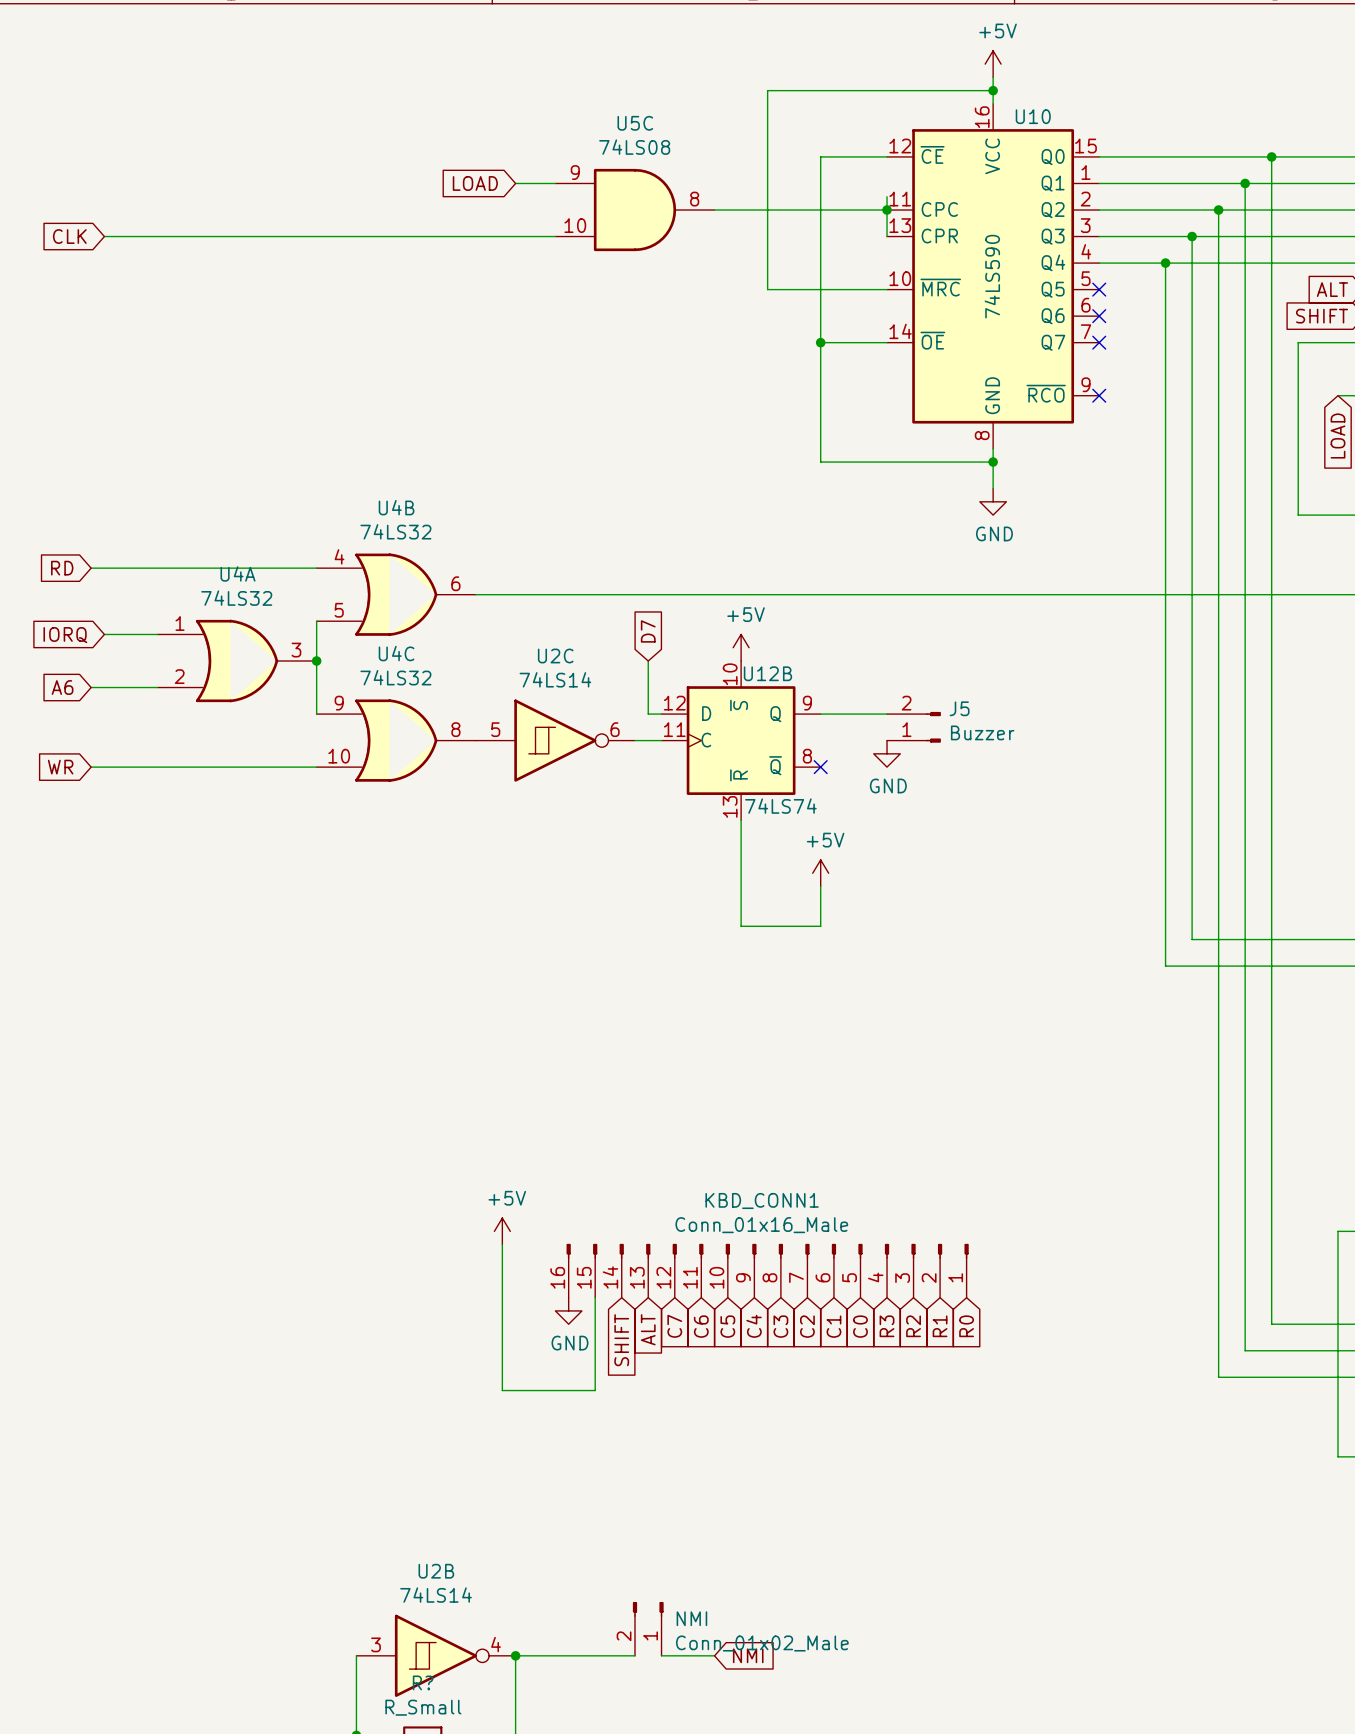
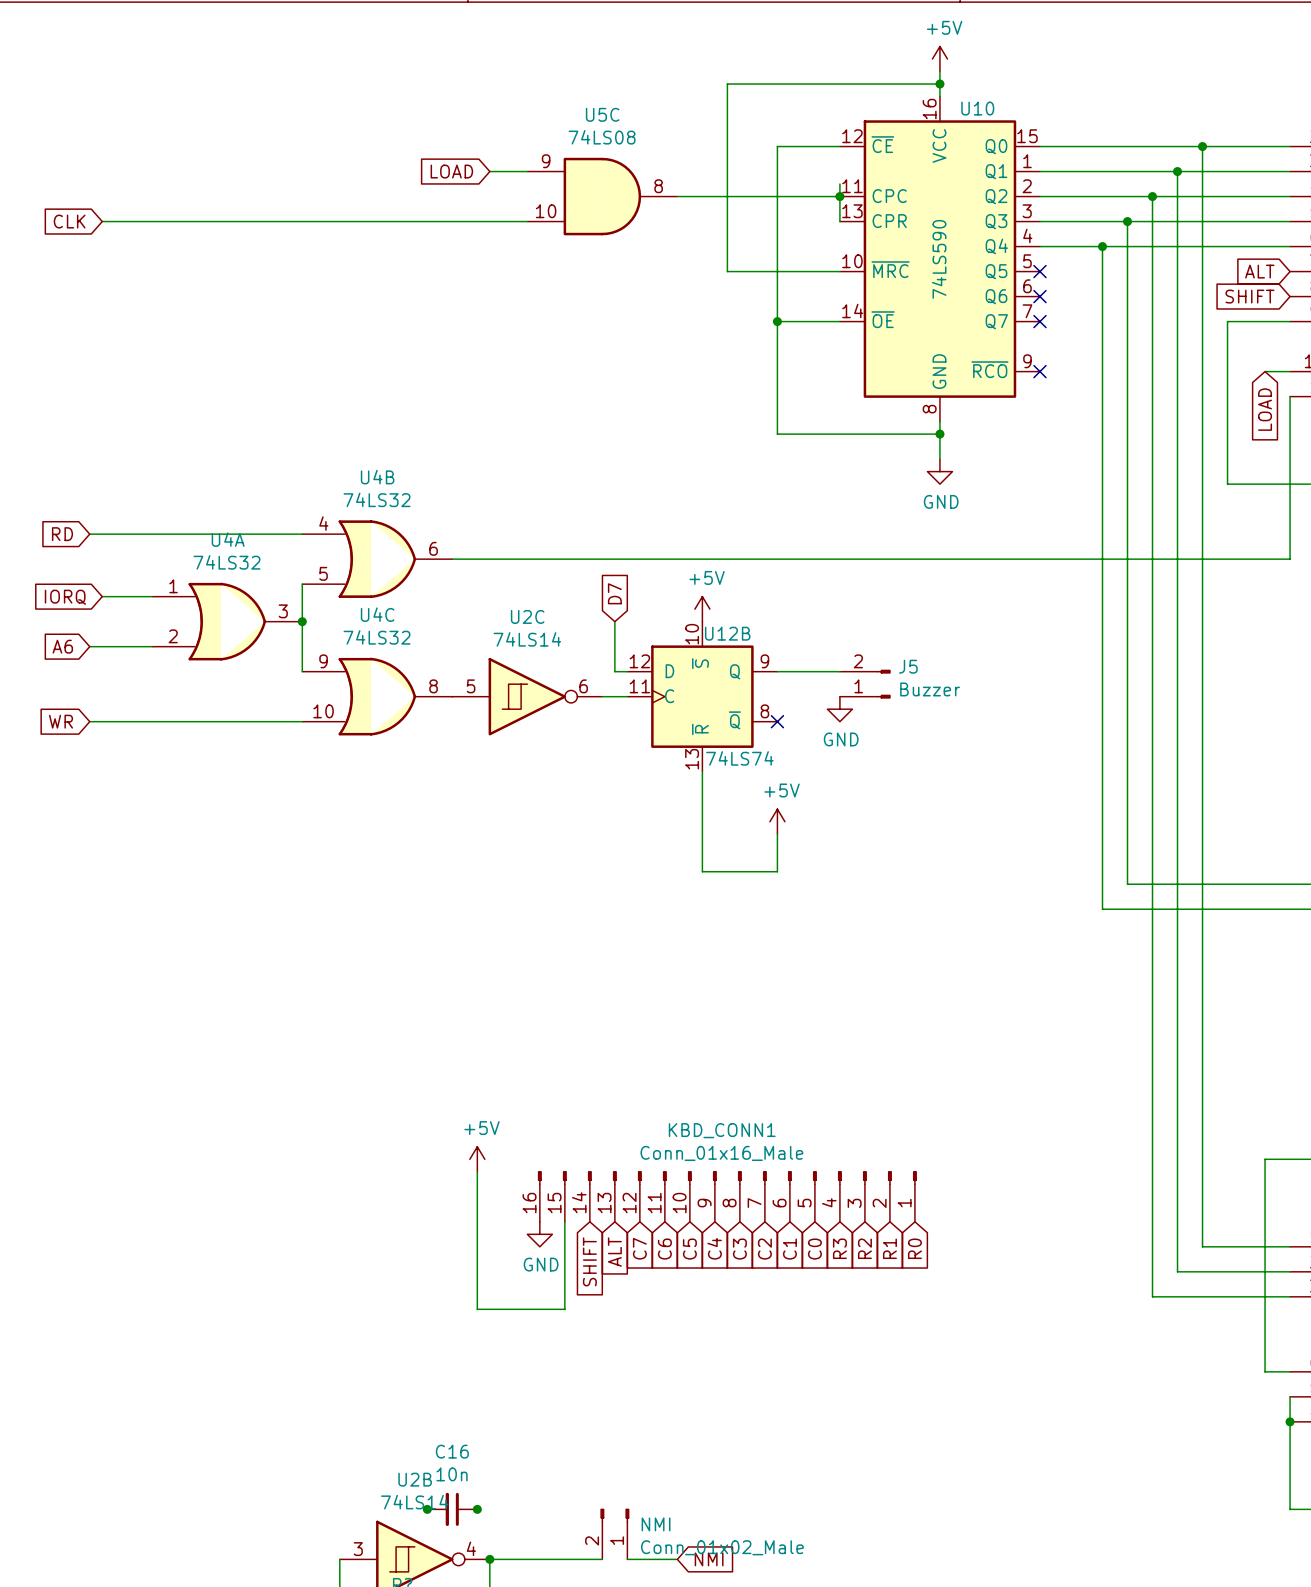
junction: none -> (427, 1509)
C16: none -> 10n (452, 1509)
junction: none -> (477, 1509)

